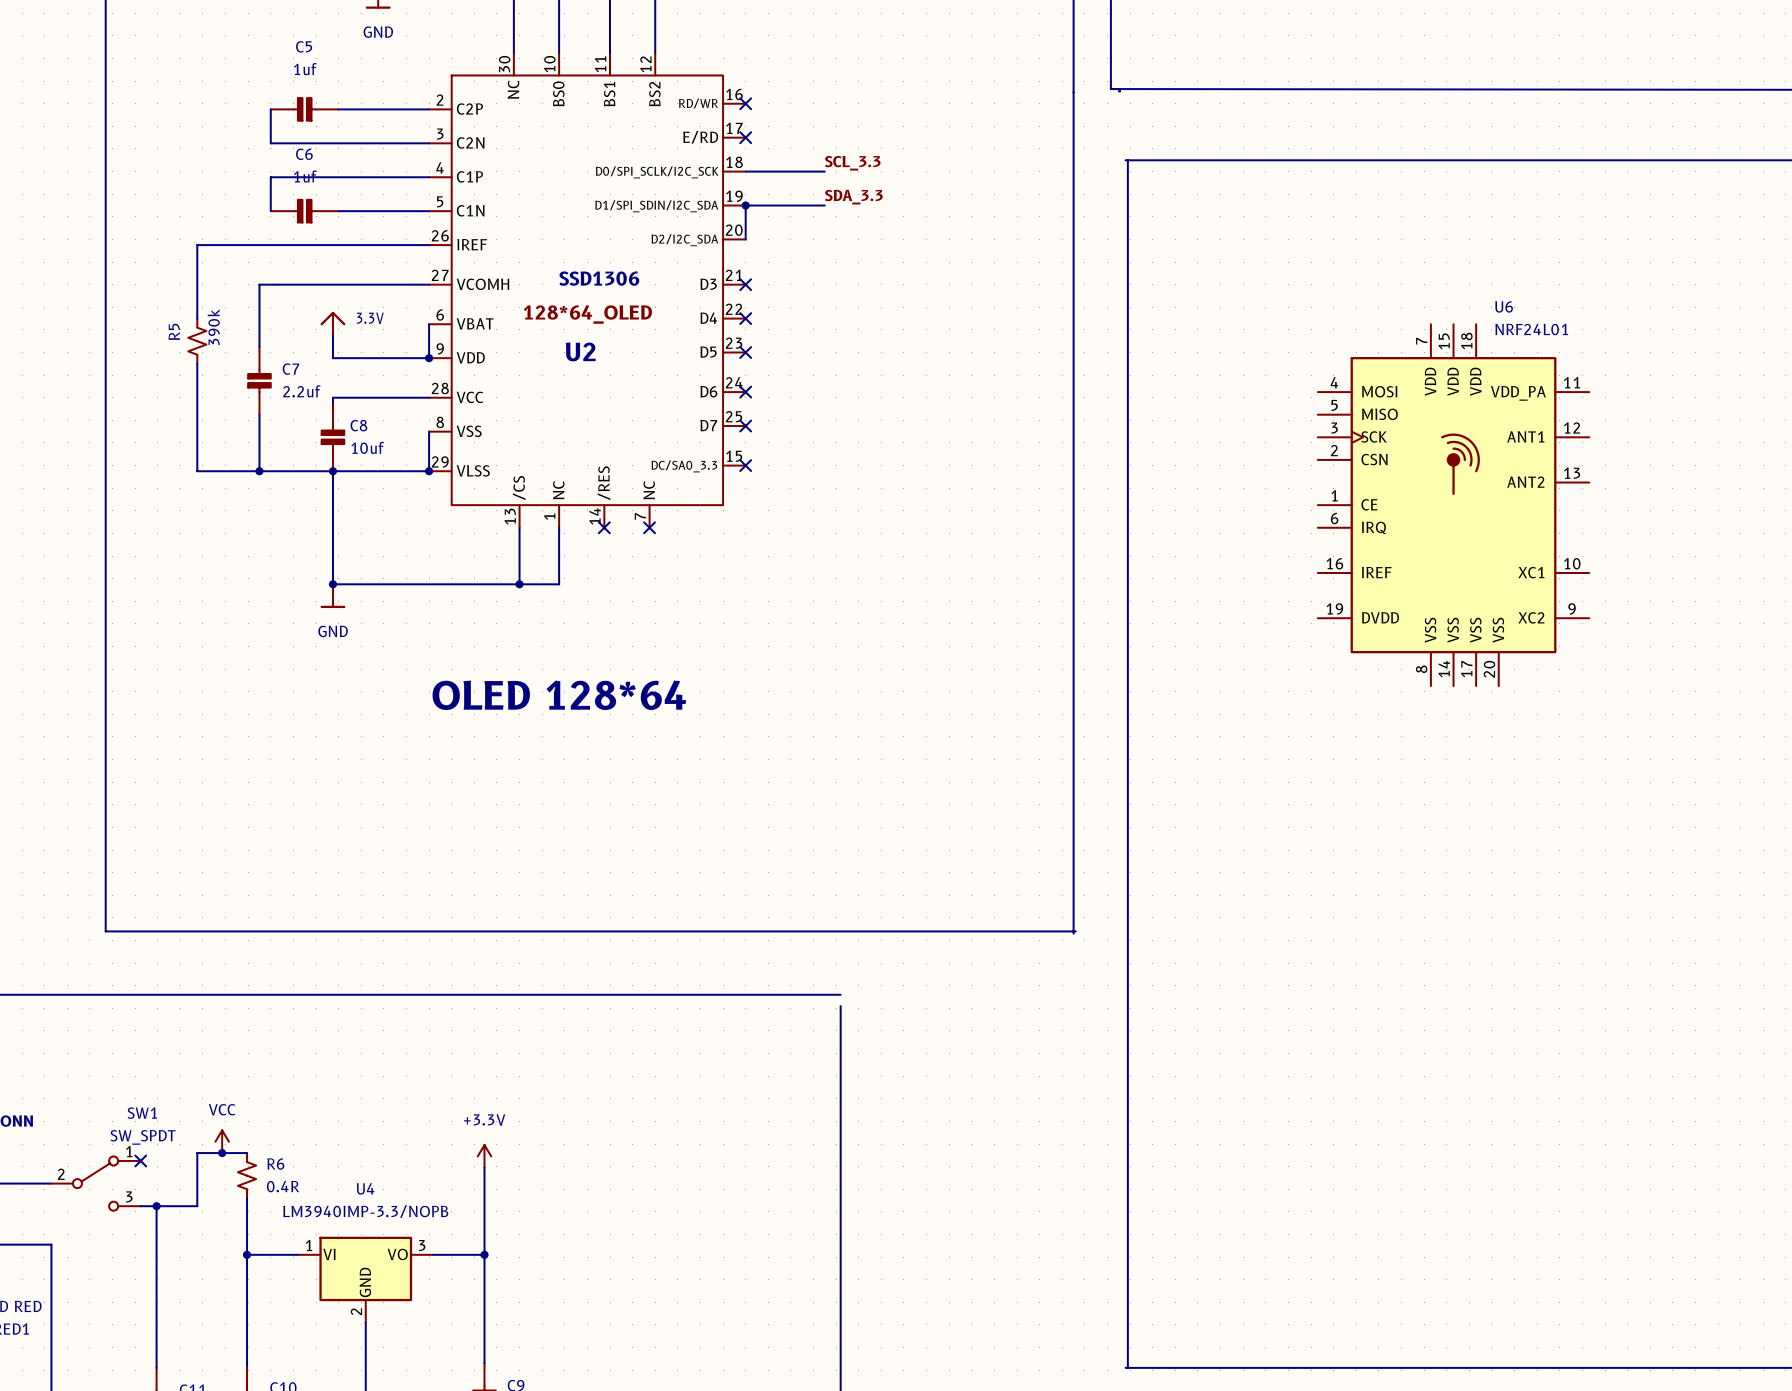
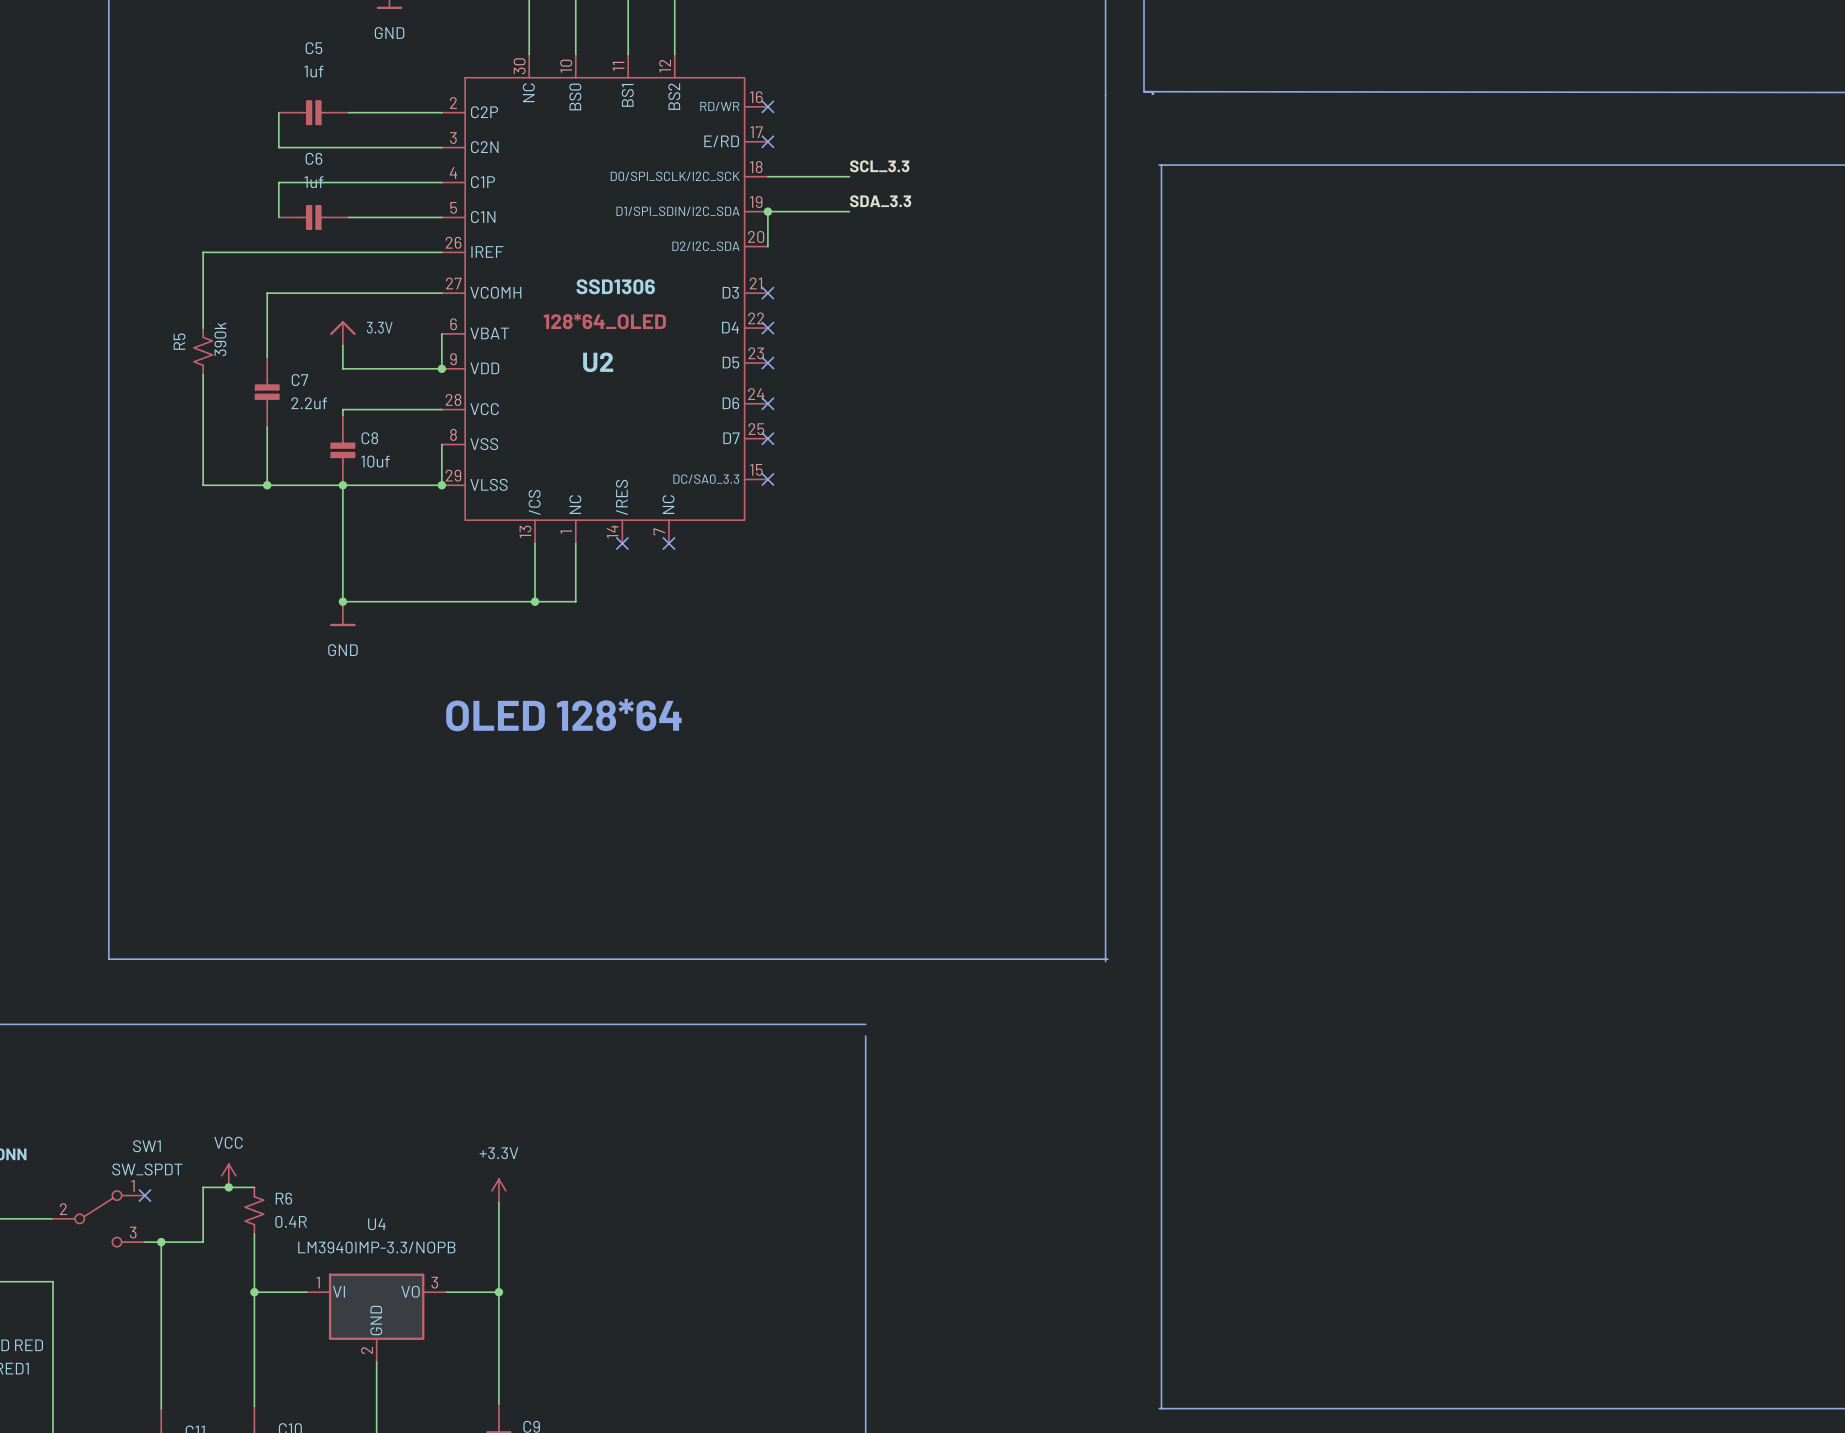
U6: NRF24L01 (1453, 505) -> none

